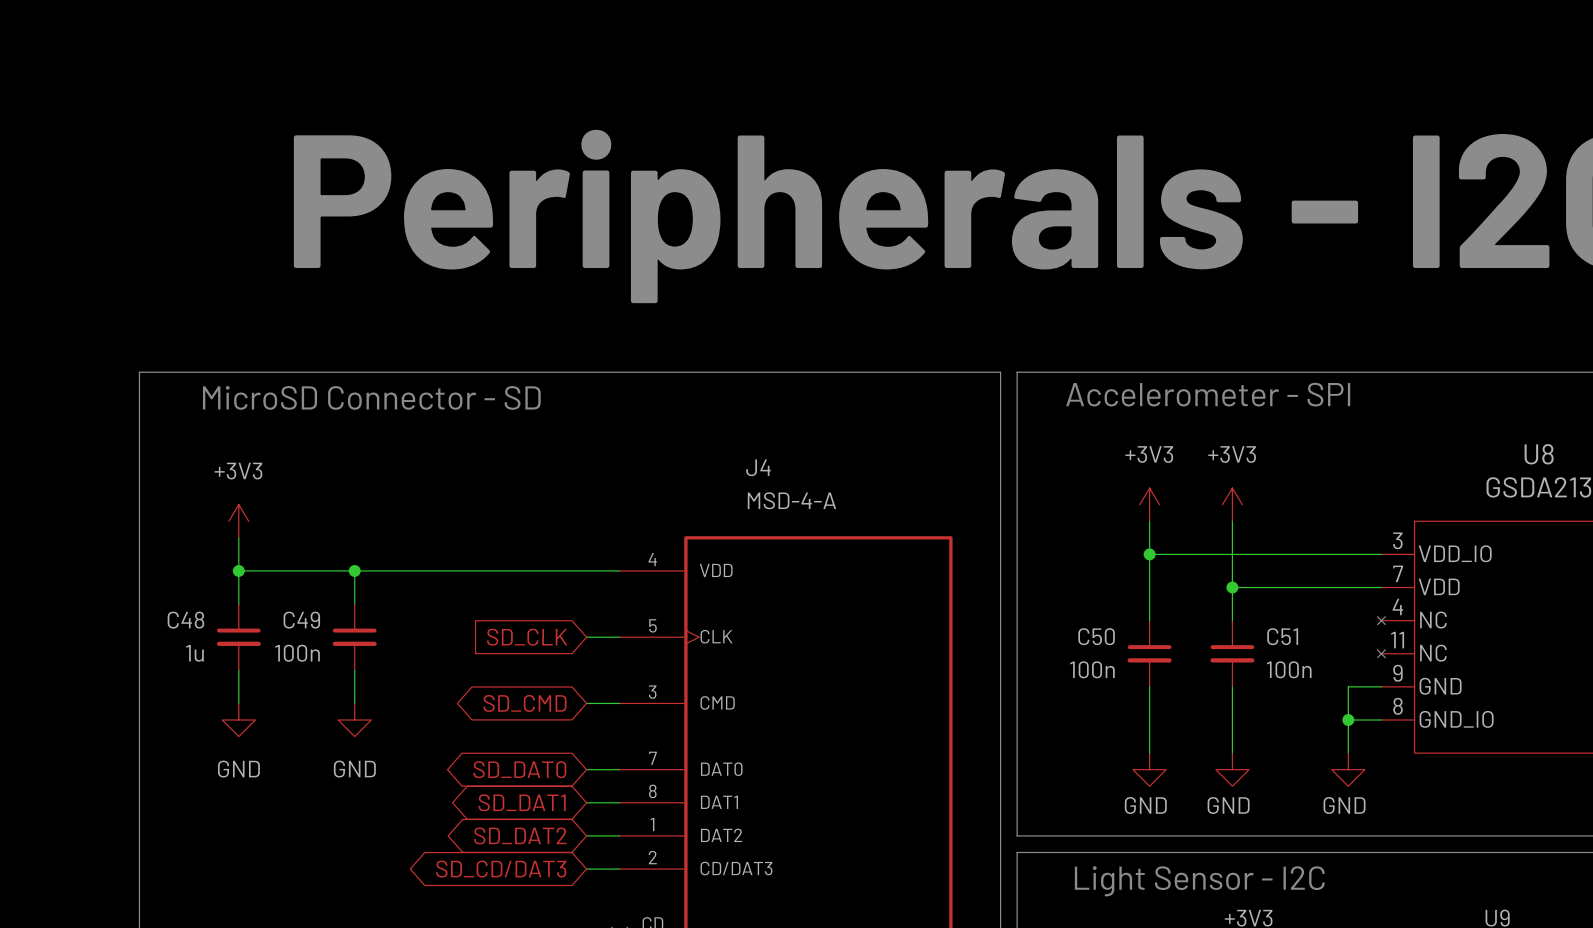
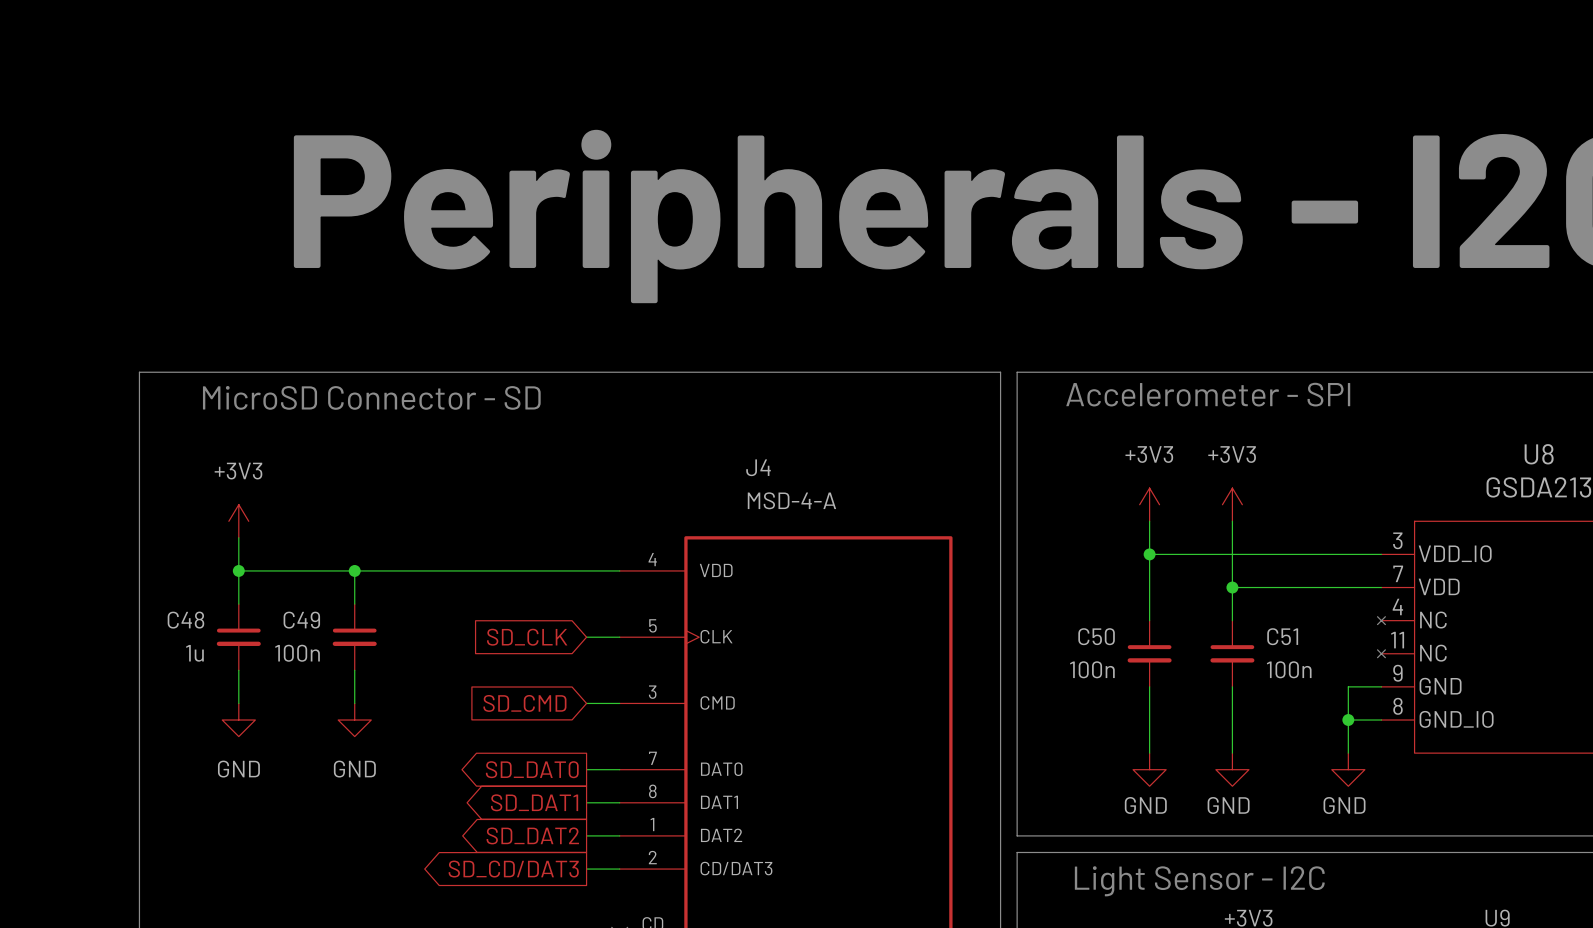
global label shape: bidirectional (524, 703) -> input (524, 703)
global label shape: bidirectional (519, 769) -> output (532, 769)
global label shape: bidirectional (522, 802) -> output (534, 802)
global label shape: bidirectional (520, 835) -> output (532, 835)
global label shape: bidirectional (501, 869) -> output (513, 869)

